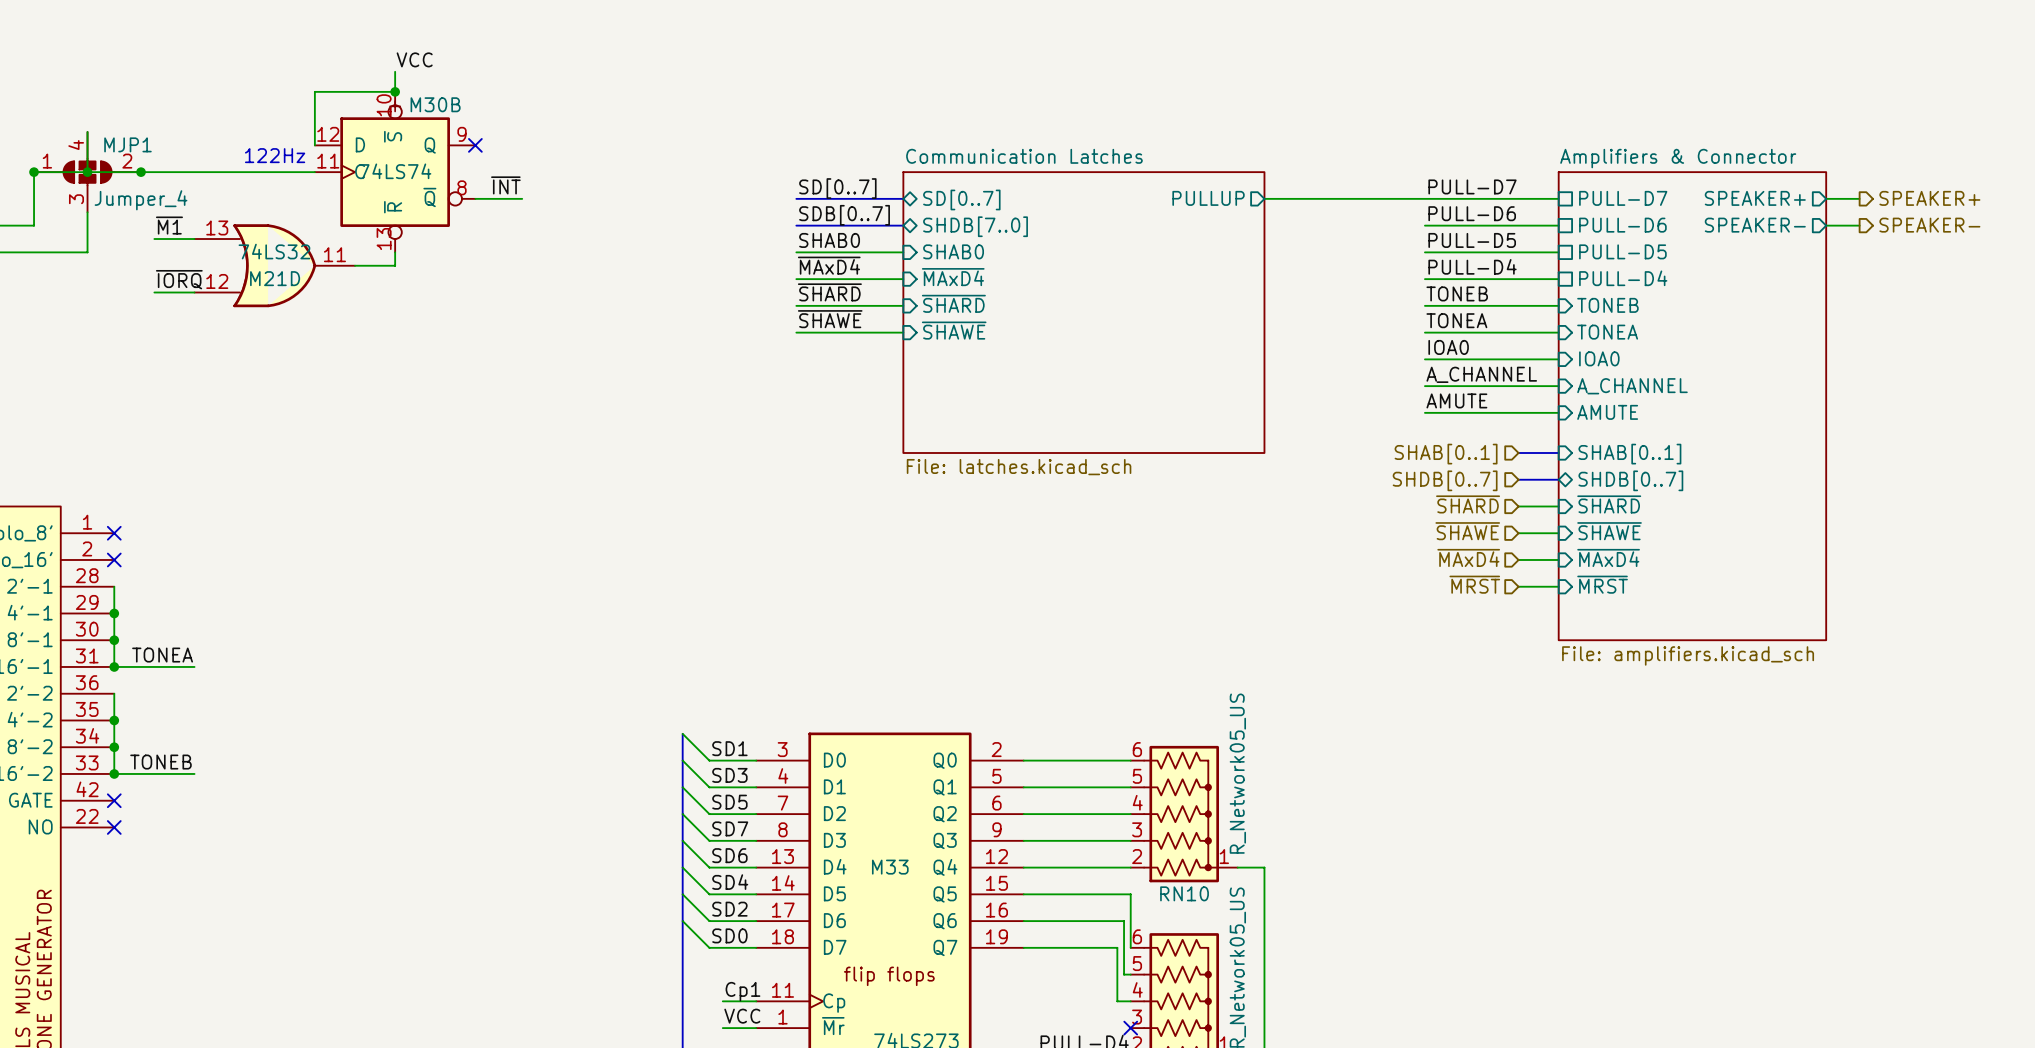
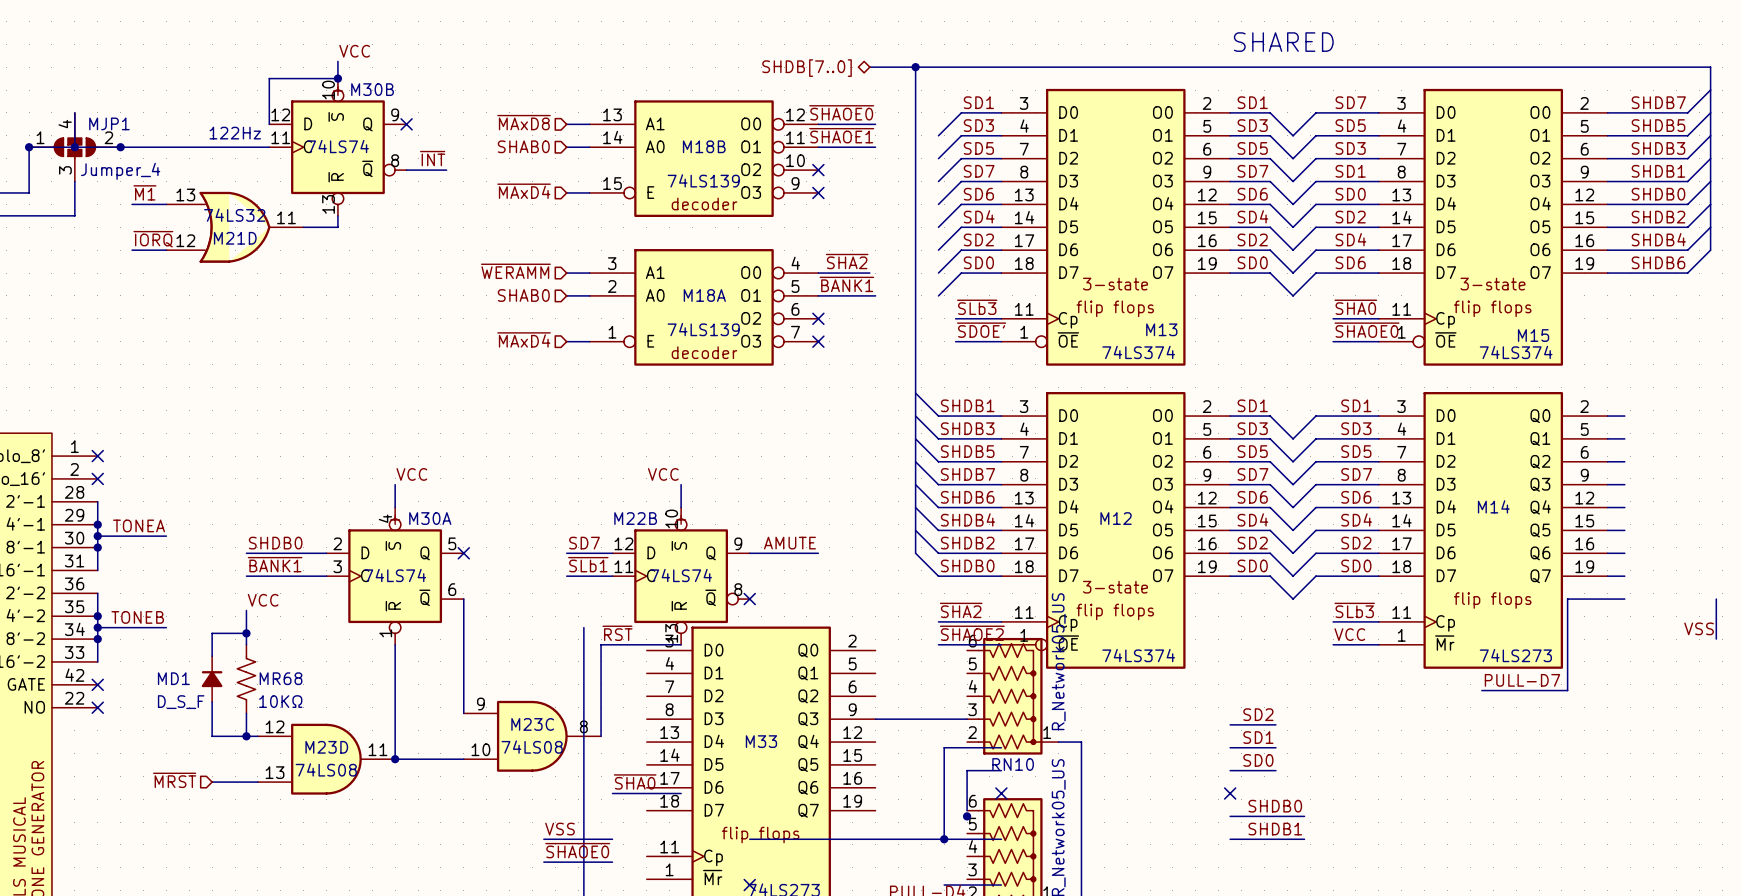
text: none -> SHARED (1283, 42)
bus: none -> (869, 67) (1710, 67) (1710, 250)
bus: none -> (915, 67) (915, 553)
junction: none -> (915, 67)
hierarchical label: none -> SHDB[7..0] (807, 68)
wire: none -> (1710, 90) (1687, 112) (1607, 112)
label: none -> SD1 (978, 102)
label: none -> SD1 (1252, 102)
label: none -> SD7 (1350, 102)
label: none -> SHDB7 (1658, 102)
label: none -> ~{SHAOE0} (841, 112)
wire: none -> (1001, 112) (961, 112) (938, 135)
wire: none -> (1230, 112) (1270, 112) (1293, 135)
wire: none -> (1378, 112) (1315, 112) (1293, 135)
wire: none -> (1710, 112) (1687, 135) (1607, 135)
hierarchical label: none -> ~{MAxD8} (524, 122)
wire: none -> (566, 124) (589, 124)
wire: none -> (818, 124) (875, 124)
label: none -> SD3 (978, 125)
label: none -> SD3 (1252, 125)
label: none -> SD5 (1350, 125)
label: none -> SHDB5 (1658, 125)
label: none -> ~{SHAOE1} (841, 135)
wire: none -> (1001, 135) (961, 135) (938, 158)
wire: none -> (1230, 135) (1270, 135) (1293, 158)
wire: none -> (1378, 135) (1315, 135) (1293, 158)
wire: none -> (1710, 135) (1687, 158) (1607, 158)
hierarchical label: none -> SHAB0 (523, 146)
wire: none -> (566, 147) (589, 147)
label: none -> SD5 (978, 148)
label: none -> SD5 (1252, 148)
label: none -> SD3 (1350, 148)
label: none -> SHDB3 (1658, 148)
M18B: none -> 74LS139 (703, 158)
wire: none -> (1001, 158) (961, 158) (938, 181)
wire: none -> (1230, 158) (1270, 158) (1293, 181)
wire: none -> (1378, 158) (1315, 158) (1293, 181)
wire: none -> (1710, 158) (1687, 181) (1607, 181)
label: PULL-D7 (1472, 186) -> none
label: SD[0..7] (837, 188) -> none
bus: (796, 198) (903, 198) -> none
no-connect mark: none -> (818, 170)
sheet pin: PULLUP (1208, 198) -> none
wire: (1264, 198) (1558, 198) -> none
sheet pin: PULL-D7 (1623, 198) -> none
sheet pin: SPEAKER+ (1755, 198) -> none
wire: (1826, 198) (1859, 198) -> none
hierarchical label: SPEAKER+ (1929, 198) -> none
sheet pin: SD[0..7] (961, 199) -> none
label: none -> SD7 (979, 171)
label: none -> SD7 (1252, 171)
label: none -> SD1 (1350, 171)
label: none -> SHDB1 (1658, 171)
wire: none -> (1001, 181) (961, 181) (938, 204)
wire: none -> (1230, 181) (1270, 181) (1293, 204)
wire: none -> (1378, 181) (1315, 181) (1293, 204)
wire: none -> (1710, 181) (1687, 204) (1607, 204)
label: PULL-D6 (1472, 213) -> none
label: SDB[0..7] (844, 215) -> none
hierarchical label: none -> ~{MAxD4} (524, 191)
wire: none -> (566, 192) (589, 192)
bus: (796, 225) (903, 225) -> none
no-connect mark: none -> (818, 192)
wire: (1424, 225) (1558, 225) -> none
sheet pin: PULL-D6 (1622, 225) -> none
sheet pin: SPEAKER- (1755, 225) -> none
wire: (1826, 225) (1859, 225) -> none
hierarchical label: SPEAKER- (1929, 225) -> none
sheet pin: SHDB[7..0] (975, 226) -> none
label: none -> SD6 (978, 194)
label: none -> SD6 (1252, 194)
label: none -> SD0 (1350, 194)
label: none -> SHDB0 (1658, 194)
wire: none -> (1001, 204) (961, 204) (938, 227)
wire: none -> (1230, 204) (1270, 204) (1293, 227)
wire: none -> (1378, 204) (1315, 204) (1293, 227)
wire: none -> (1710, 204) (1687, 227) (1607, 227)
label: SHAB0 (829, 240) -> none
label: PULL-D5 (1472, 240) -> none
sheet pin: SHAB0 (953, 251) -> none
sheet pin: PULL-D5 (1622, 251) -> none
wire: (1424, 252) (1558, 252) -> none
label: none -> SD4 (979, 216)
label: none -> SD4 (1252, 216)
label: none -> SD2 (1350, 217)
label: none -> SHDB2 (1658, 217)
label: ~{MAxD4} (829, 265) -> none
wire: none -> (1001, 227) (961, 227) (938, 250)
M13: none -> 74LS374 (1115, 227)
wire: none -> (1230, 227) (1270, 227) (1293, 250)
wire: none -> (1378, 227) (1315, 227) (1293, 250)
M15: none -> 74LS374 (1493, 227)
wire: none -> (1710, 227) (1687, 250) (1607, 250)
label: PULL-D4 (1472, 266) -> none
sheet pin: ~{MAxD4} (953, 277) -> none
sheet pin: PULL-D4 (1623, 278) -> none
wire: (796, 279) (903, 279) -> none
wire: (1424, 279) (1558, 279) -> none
label: none -> SD2 (978, 239)
label: none -> SD2 (1252, 239)
label: none -> SD4 (1350, 239)
label: none -> SHDB4 (1658, 239)
label: ~{SHARD} (829, 292) -> none
wire: none -> (1001, 250) (961, 250) (938, 273)
wire: none -> (1230, 250) (1270, 250) (1293, 273)
wire: none -> (1378, 250) (1315, 250) (1293, 273)
wire: none -> (1710, 250) (1687, 273) (1607, 273)
label: TONEB (1457, 293) -> none
sheet pin: ~{SHARD} (953, 303) -> none
label: none -> ~{SHA2} (847, 261)
wire: (1424, 305) (1558, 305) -> none
sheet pin: TONEB (1607, 305) -> none
label: none -> SD0 (978, 262)
label: none -> SD0 (1252, 262)
label: none -> SD6 (1350, 262)
label: none -> SHDB6 (1658, 262)
sheet Communication Latches: File: latches.kicad_sch (1083, 312) -> none
hierarchical label: none -> ~{WERAMM} (515, 271)
wire: none -> (566, 273) (589, 273)
label: ~{SHAWE} (830, 319) -> none
wire: none -> (818, 273) (869, 273)
wire: none -> (1001, 273) (961, 273) (938, 295)
wire: none -> (1230, 273) (1270, 273) (1293, 295)
wire: none -> (1378, 273) (1315, 273) (1293, 295)
label: TONEA (1456, 320) -> none
sheet pin: ~{SHAWE} (954, 330) -> none
label: none -> ~{BANK1} (846, 284)
wire: (1424, 332) (1558, 332) -> none
sheet pin: TONEA (1607, 332) -> none
hierarchical label: none -> SHAB0 (523, 295)
wire: none -> (566, 295) (589, 295)
wire: none -> (818, 295) (875, 295)
label: IOA0 (1448, 347) -> none
sheet pin: IOA0 (1599, 358) -> none
M18A: none -> 74LS139 (703, 307)
label: none -> ~{SLb3} (977, 307)
wire: (1424, 359) (1558, 359) -> none
label: none -> ~{SHA0} (1355, 307)
no-connect mark: none -> (818, 318)
wire: none -> (955, 318) (1001, 318)
wire: none -> (1333, 318) (1378, 318)
label: A_CHANNEL (1481, 374) -> none
label: none -> ~{SDOE'} (981, 330)
wire: (1424, 386) (1558, 386) -> none
label: none -> ~{SHAOE0} (1366, 330)
sheet pin: A_CHANNEL (1632, 386) -> none
hierarchical label: none -> ~{MAxD4} (524, 339)
wire: none -> (566, 341) (589, 341)
no-connect mark: none -> (818, 341)
wire: none -> (955, 341) (1001, 341)
wire: none -> (1333, 341) (1378, 341)
label: AMUTE (1456, 400) -> none
sheet Amplifiers & Connector: File: amplifiers.kicad_sch (1692, 406) -> none
wire: (1424, 412) (1558, 412) -> none
sheet pin: AMUTE (1607, 412) -> none
bus: (1518, 452) (1558, 452) -> none
hierarchical label: SHAB[0..1] (1446, 454) -> none
sheet pin: SHAB[0..1] (1629, 454) -> none
wire: none -> (915, 393) (938, 416) (1001, 416)
label: none -> SHDB1 (967, 405)
label: none -> SD1 (1252, 405)
label: none -> SD1 (1356, 405)
bus: (1518, 479) (1558, 479) -> none
hierarchical label: SHDB[0..7] (1445, 480) -> none
sheet pin: SHDB[0..7] (1630, 480) -> none
wire: none -> (915, 416) (938, 438) (1001, 438)
wire: none -> (1230, 416) (1270, 416) (1293, 438)
wire: none -> (1378, 416) (1315, 416) (1293, 438)
wire: none -> (1607, 416) (1624, 416)
label: none -> SHDB3 (967, 428)
label: none -> SD3 (1252, 428)
label: none -> SD3 (1356, 428)
hierarchical label: ~{SHARD} (1468, 504) -> none
sheet pin: ~{SHARD} (1609, 504) -> none
wire: (1518, 506) (1558, 506) -> none
wire: none -> (915, 438) (938, 461) (1001, 461)
wire: none -> (1230, 438) (1270, 438) (1293, 461)
wire: none -> (1378, 438) (1315, 438) (1293, 461)
wire: none -> (1607, 438) (1624, 438)
label: none -> SHDB5 (967, 451)
label: none -> SD5 (1252, 451)
label: none -> SD5 (1356, 451)
hierarchical label: ~{SHAWE} (1467, 531) -> none
sheet pin: ~{SHAWE} (1609, 531) -> none
wire: (1518, 533) (1558, 533) -> none
wire: none -> (915, 461) (938, 484) (1001, 484)
wire: none -> (1230, 461) (1270, 461)
wire: none -> (1270, 461) (1293, 484)
wire: none -> (1378, 461) (1315, 461) (1293, 484)
wire: none -> (1607, 461) (1624, 461)
label: none -> VCC (411, 474)
label: none -> VCC (663, 474)
label: none -> SHDB7 (967, 474)
label: none -> SD7 (1252, 474)
label: none -> SD7 (1356, 474)
hierarchical label: ~{MAxD4} (1468, 557) -> none
sheet pin: ~{MAxD4} (1608, 557) -> none
wire: (1518, 559) (1558, 559) -> none
wire: none -> (395, 484) (395, 507)
wire: none -> (681, 484) (681, 507)
wire: none -> (915, 484) (938, 507) (1001, 507)
wire: none -> (1230, 484) (1270, 484)
wire: none -> (1270, 484) (1293, 507)
wire: none -> (1378, 484) (1315, 484) (1293, 507)
wire: none -> (1607, 484) (1624, 484)
label: none -> SHDB6 (967, 497)
label: none -> SD6 (1252, 497)
label: none -> SD6 (1356, 497)
hierarchical label: ~{MRST} (1474, 584) -> none
sheet pin: ~{MRST} (1602, 584) -> none
wire: (1518, 586) (1558, 586) -> none
wire: none -> (915, 507) (938, 530) (1001, 530)
wire: none -> (1230, 507) (1270, 507) (1293, 530)
wire: none -> (1378, 507) (1315, 507) (1293, 530)
wire: none -> (1607, 507) (1624, 507)
label: none -> SHDB4 (967, 519)
label: none -> SD4 (1252, 519)
label: none -> SD4 (1356, 519)
wire: none -> (915, 530) (938, 553) (1001, 553)
M12: none -> 74LS374 (1115, 530)
wire: none -> (1230, 530) (1270, 530)
wire: none -> (1270, 530) (1293, 553)
wire: none -> (1378, 530) (1315, 530) (1293, 553)
M14: none -> 74LS273 (1493, 530)
wire: none -> (1607, 530) (1624, 530)
junction: none -> (97, 536)
label: none -> SHDB0 (275, 543)
label: none -> AMUTE (789, 543)
label: none -> SHDB2 (967, 543)
label: none -> SD2 (1252, 543)
label: none -> SD2 (1356, 543)
wire: none -> (246, 553) (326, 553)
no-connect mark: none -> (463, 553)
wire: none -> (566, 553) (612, 553)
wire: none -> (749, 553) (818, 553)
wire: none -> (915, 553) (938, 576) (1001, 576)
wire: none -> (1230, 553) (1270, 553) (1293, 576)
wire: none -> (1378, 553) (1315, 553) (1293, 576)
wire: none -> (1607, 553) (1624, 553)
label position: TONEA (162, 655) -> TONEA (139, 525)
label: none -> ~{BANK1} (275, 564)
label: none -> ~{SLb1} (588, 564)
label: none -> SHDB0 (967, 565)
label: none -> SD0 (1252, 565)
label: none -> SD0 (1356, 565)
wire: (114, 666) (194, 666) -> (97, 536) (166, 536)
junction: (114, 666) -> none
wire: none -> (246, 576) (326, 576)
M30A: none -> 74LS74 (395, 576)
wire: none -> (566, 576) (612, 576)
M22B: none -> 74LS74 (681, 576)
wire: none -> (1230, 576) (1270, 576)
wire: none -> (1270, 576) (1293, 599)
wire: none -> (1378, 576) (1315, 576) (1293, 599)
wire: none -> (1607, 576) (1624, 576)
wire: none -> (463, 599) (463, 713)
no-connect mark: none -> (749, 599)
wire: none -> (1624, 599) (1567, 599) (1567, 690) (1481, 690)
wire: none -> (1716, 599) (1716, 639)
label: none -> VCC (263, 600)
wire: none -> (246, 610) (246, 644)
label: none -> ~{SHA2} (961, 610)
label: none -> ~{SLb3} (1354, 610)
wire: none -> (938, 621) (1001, 621)
wire: none -> (1333, 621) (1378, 621)
junction: none -> (97, 627)
wire: (682, 733) (709, 760) (756, 760) -> none
label: none -> VSS (1699, 628)
wire: none -> (246, 633) (212, 633) (212, 656)
junction: none -> (246, 633)
label: none -> ~{SHAOE2} (972, 633)
label: none -> VCC (1349, 634)
label: SD1 (729, 748) -> ~{RST} (617, 633)
wire: none -> (395, 644) (395, 759) (463, 759)
wire: none -> (681, 644) (601, 644) (601, 736)
wire: none -> (938, 644) (1001, 644)
wire: none -> (1333, 644) (1378, 644)
wire: (682, 760) (709, 787) (756, 787) -> none
wire: (1023, 760) (1130, 760) -> none
label position: TONEB (160, 762) -> TONEB (137, 617)
wire: (114, 773) (194, 773) -> (97, 627) (166, 627)
junction: (114, 773) -> none
label: SD3 (729, 775) -> none
wire: (682, 787) (709, 814) (756, 814) -> none
wire: (1023, 787) (1130, 787) -> none
MD1: none -> D_S_F (212, 679)
MR68: none -> 10KΩ (246, 679)
label: none -> PULL-D7 (1522, 680)
label: SD5 (729, 802) -> none
wire: (682, 814) (709, 840) (756, 840) -> none
wire: (1023, 814) (1130, 814) -> none
wire: none -> (212, 702) (212, 736) (257, 736)
label position: SD7 (730, 828) -> SD7 (584, 543)
wire: none -> (246, 713) (246, 736)
label: none -> SD2 (1258, 714)
wire: (682, 840) (709, 867) (756, 867) -> none
wire: none -> (1230, 724) (1275, 724)
label: SD6 (729, 855) -> none
junction: none -> (246, 736)
M23C: none -> 74LS08 (532, 736)
label: none -> SD1 (1258, 737)
wire: (682, 867) (709, 894) (756, 894) -> none
wire: (1023, 867) (1130, 867) -> none
wire: none -> (1001, 747) (944, 747) (944, 839)
wire: none -> (1230, 747) (1275, 747)
label: SD4 (730, 882) -> none
M23D: none -> 74LS08 (326, 759)
junction: none -> (395, 759)
label: none -> SD0 (1258, 760)
wire: (682, 894) (709, 921) (756, 921) -> none
wire: (1023, 894) (1130, 894) (1130, 901) -> (1001, 770) (967, 770)
wire: none -> (1230, 770) (1275, 770)
label: SD2 (729, 909) -> ~{SHA0} (635, 781)
hierarchical label: none -> ~{MRST} (174, 780)
wire: none -> (212, 782) (257, 782)
wire: (682, 921) (709, 947) (756, 947) -> none
wire: (1023, 921) (1124, 921) (1124, 974) (1130, 974) -> none
wire: none -> (612, 793) (681, 793)
no-connect mark: none -> (1001, 793)
no-connect mark: none -> (1230, 793)
label: SD0 (729, 935) -> none
label: none -> SHDB0 (1275, 806)
wire: (1023, 947) (1117, 947) (1117, 1001) (1130, 1001) -> none
junction: none -> (967, 816)
wire: none -> (1230, 816) (1304, 816)
label: none -> VSS (560, 829)
label: none -> SHDB1 (1275, 829)
wire: none -> (543, 839) (612, 839)
wire: none -> (749, 839) (1001, 839)
junction: none -> (944, 839)
wire: none -> (1230, 839) (1304, 839)
label: Cp1 (742, 991) -> none
label: none -> ~{SHAOE0} (577, 850)
wire: (722, 1001) (756, 1001) -> none
wire: none -> (543, 862) (612, 862)
label: VCC (742, 1016) -> none
wire: (722, 1028) (756, 1028) -> none
no-connect mark: (1130, 1028) -> none
no-connect mark: none -> (749, 885)
wire: none -> (944, 885) (1001, 885)

